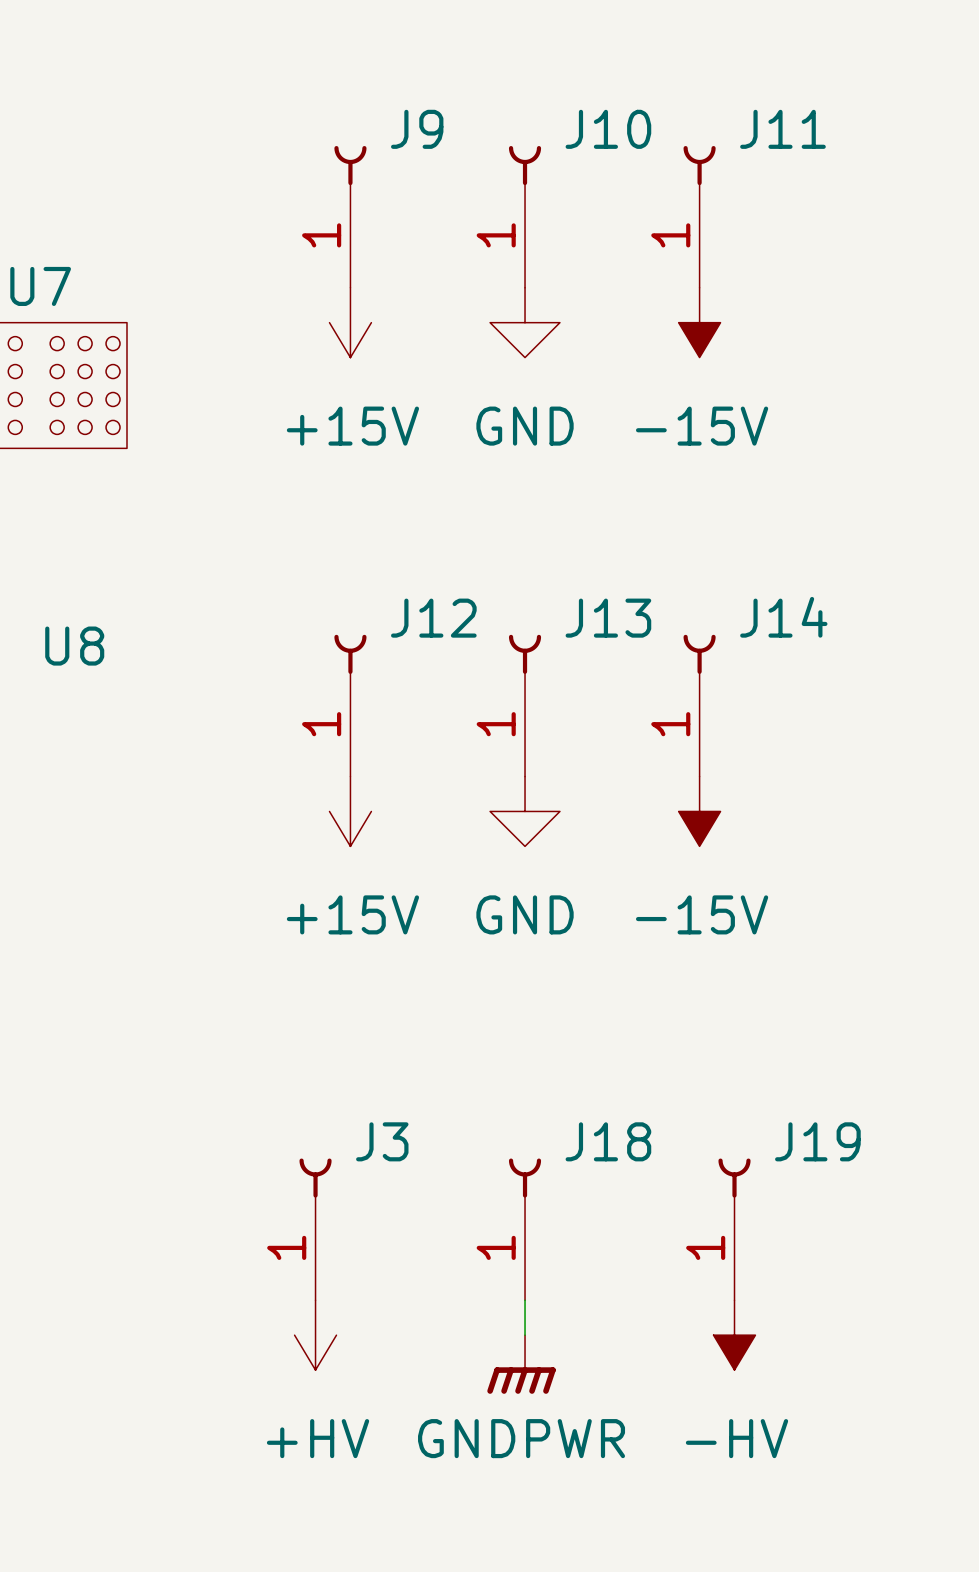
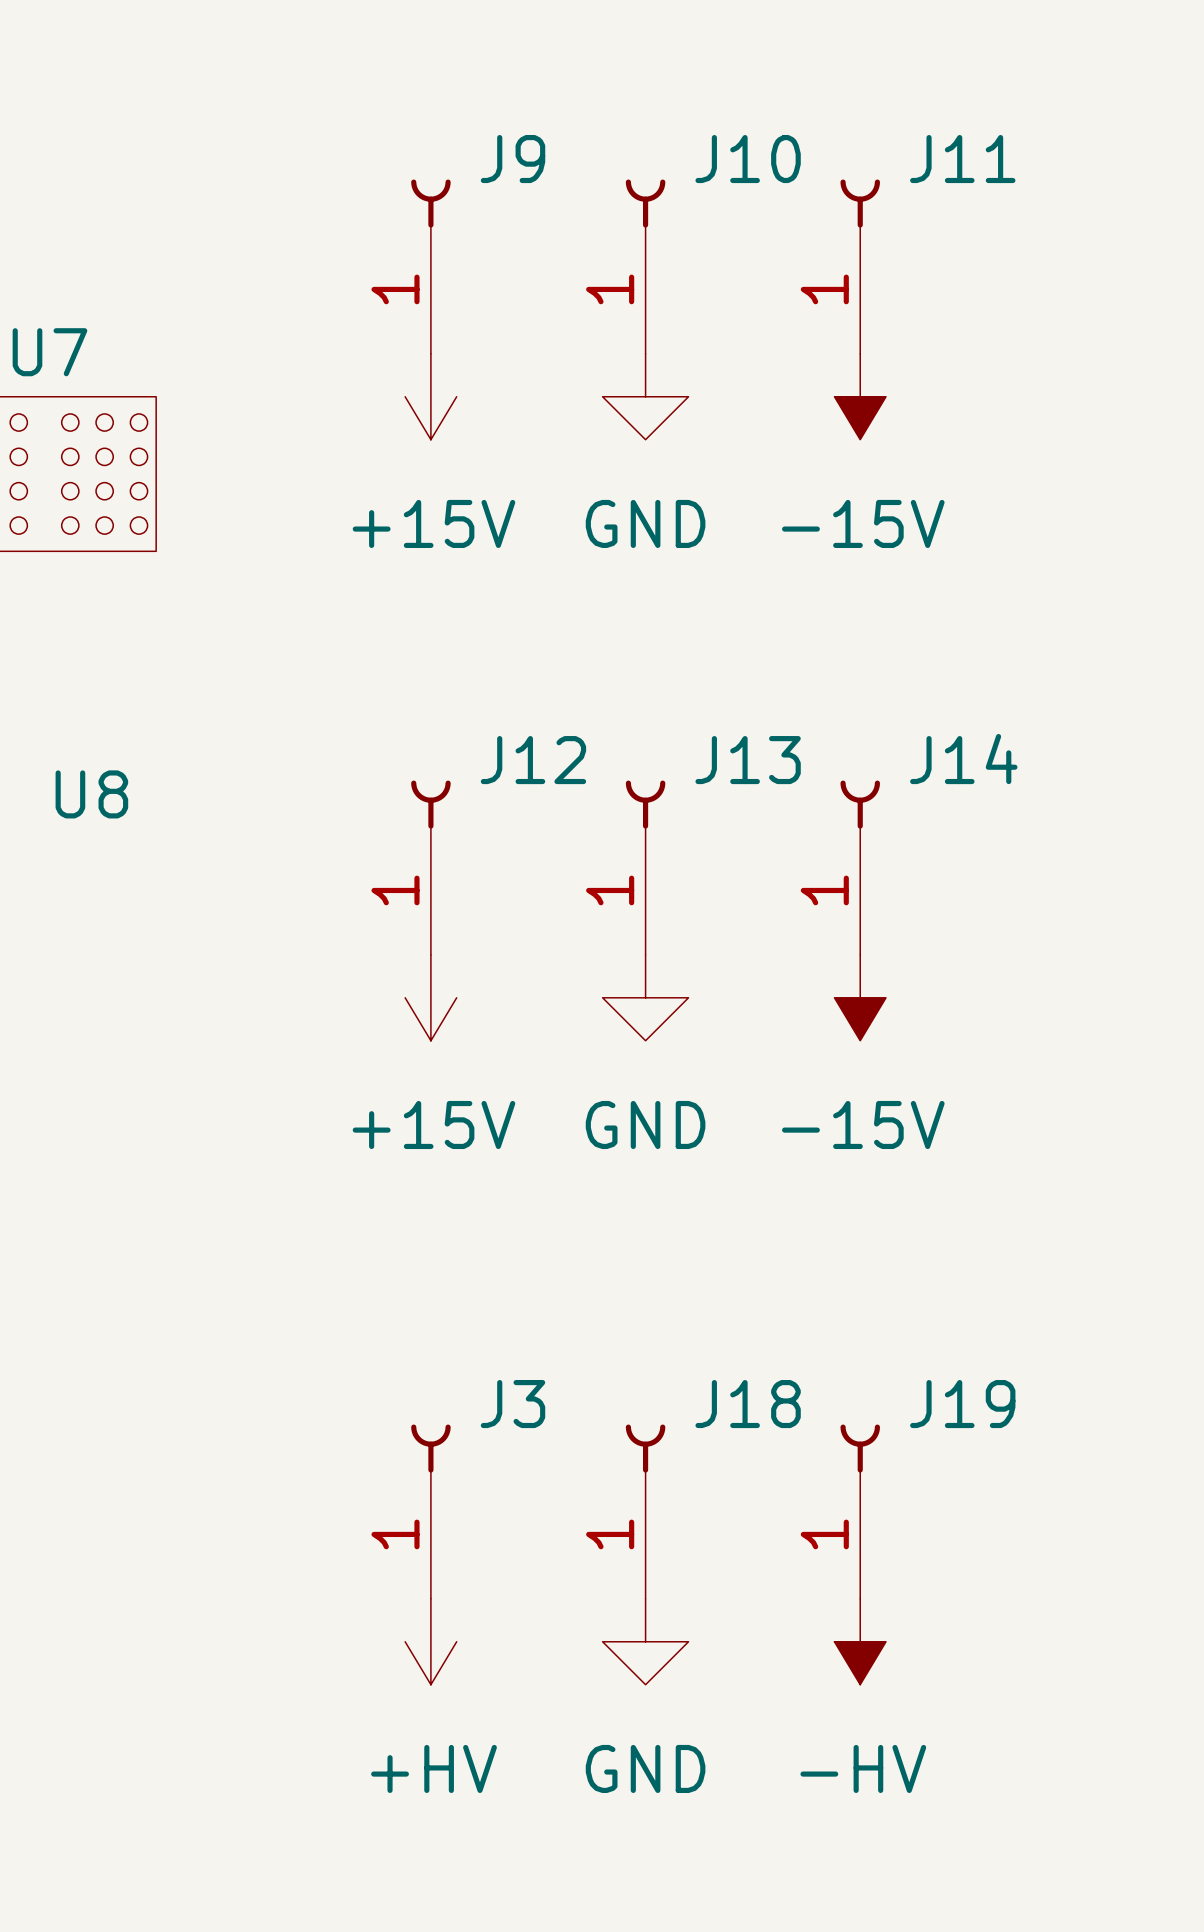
J3 position: (315, 1229) -> (430, 1511)
J19 position: (734, 1229) -> (860, 1511)
power symbol position: +HV (315, 1335) -> +HV (430, 1641)
power symbol: none -> GND (645, 1641)
power symbol position: -HV (734, 1335) -> -HV (860, 1641)
power symbol: GNDPWR (521, 1364) -> none

